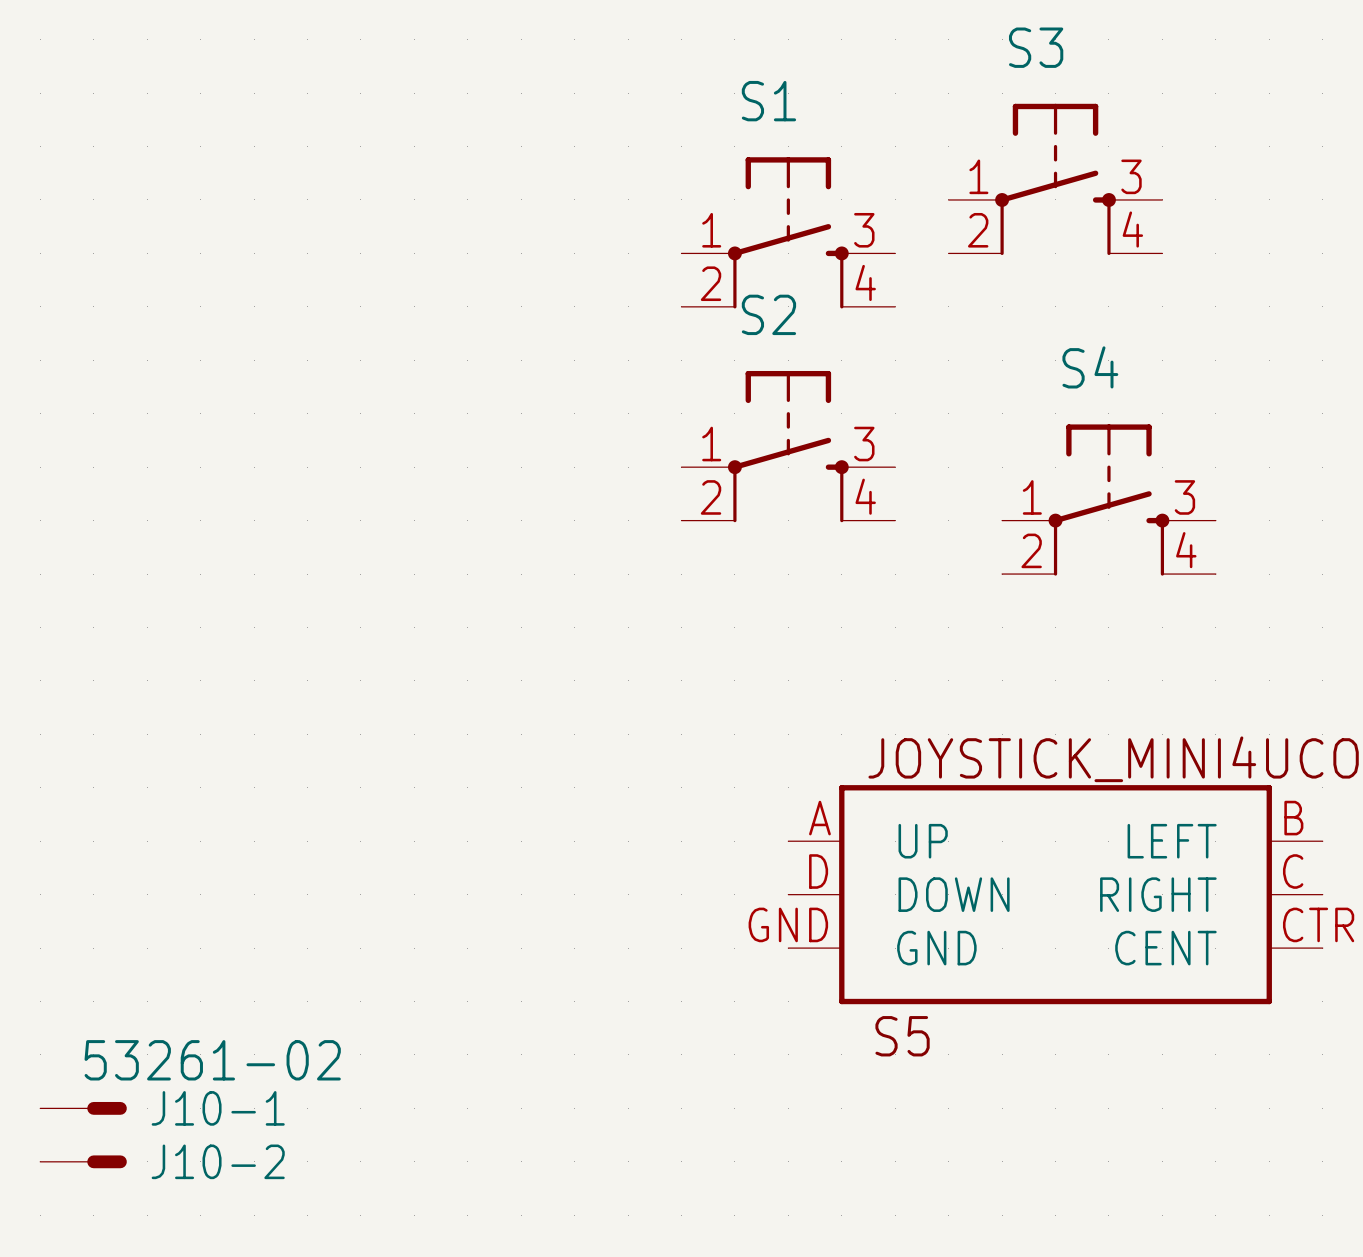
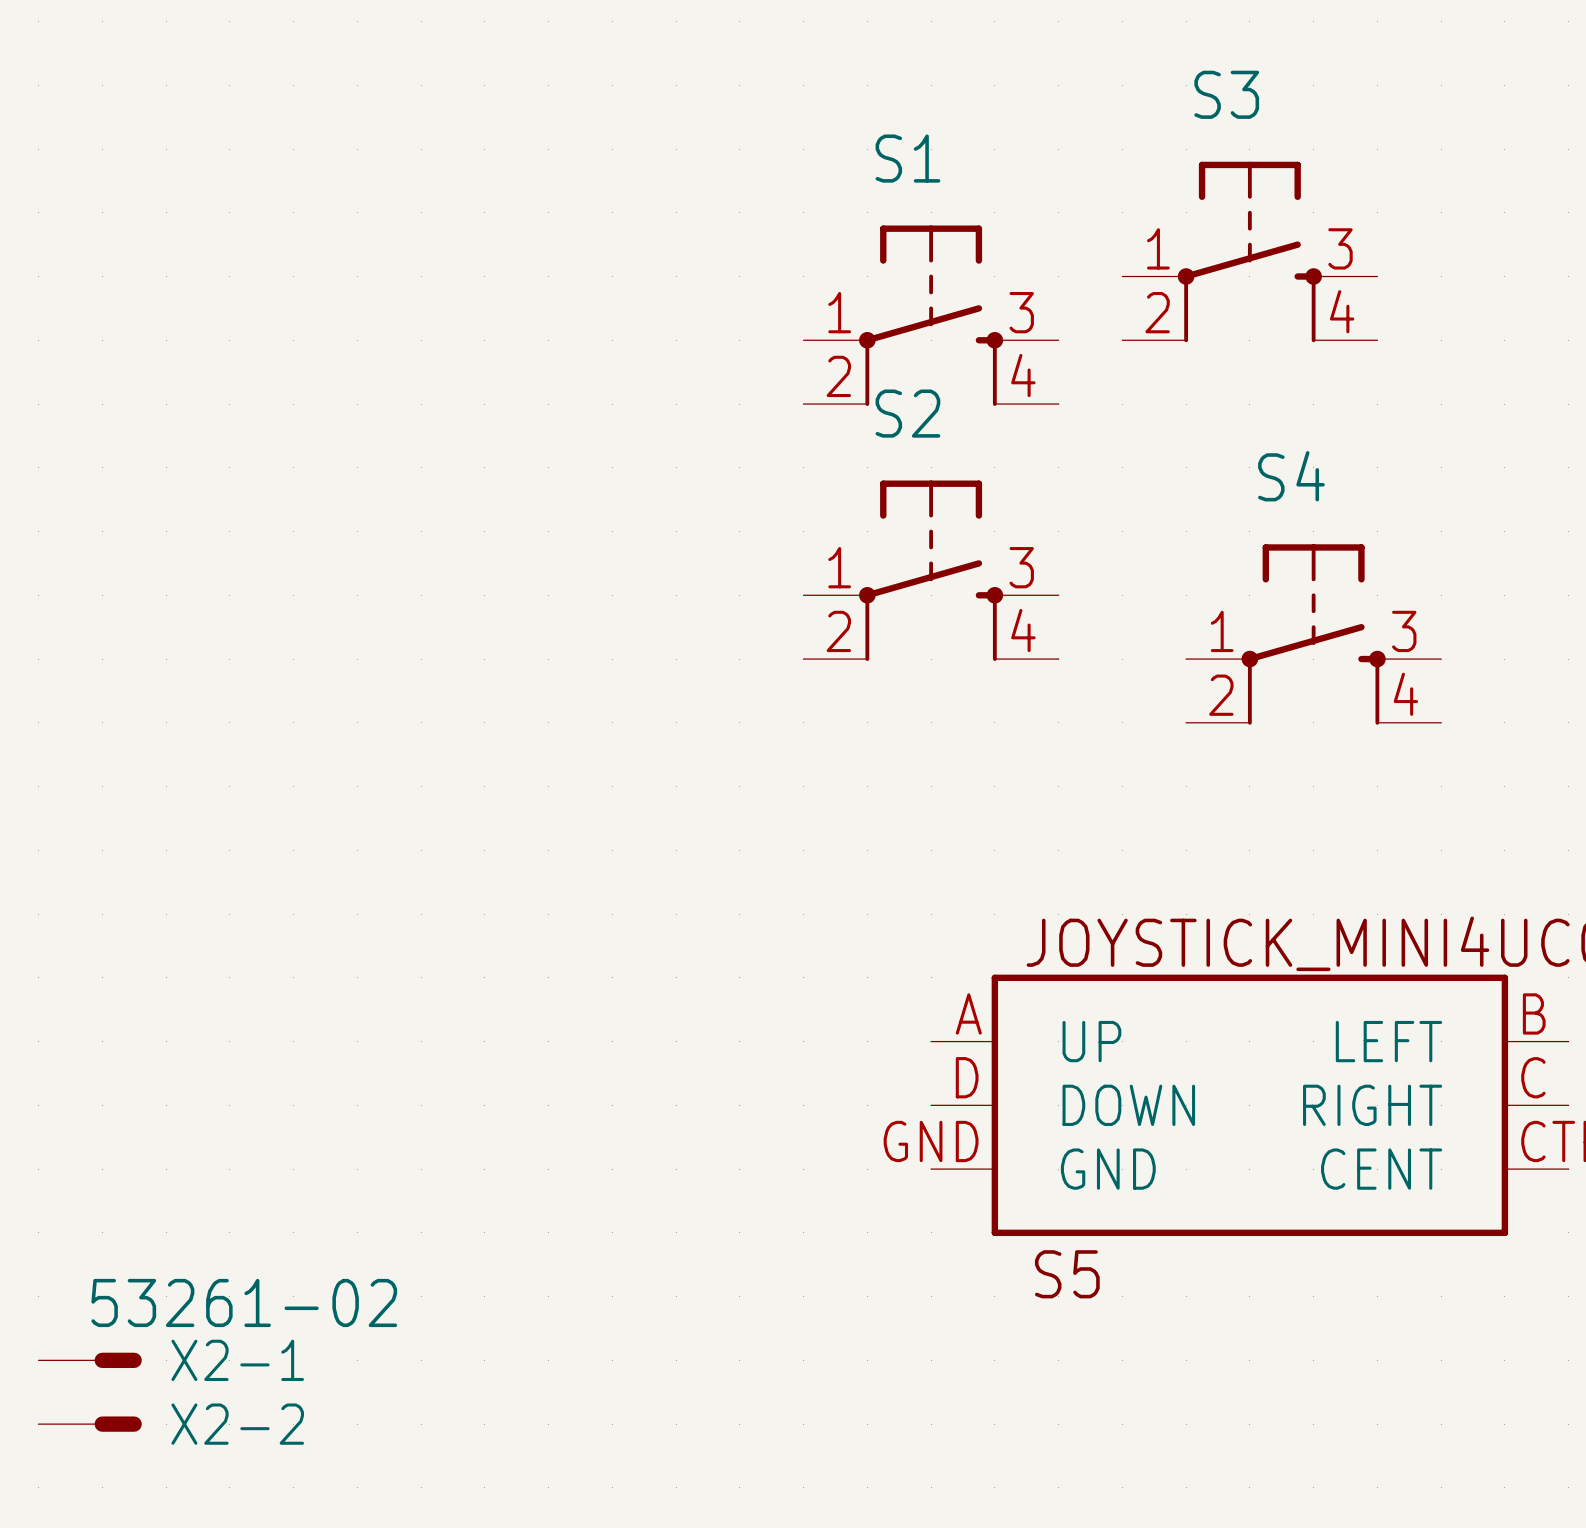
J10-1 name: J10-1 (218, 1108) -> X2-1 (237, 1360)
J10-2 name: J10-2 (218, 1161) -> X2-2 (237, 1424)

